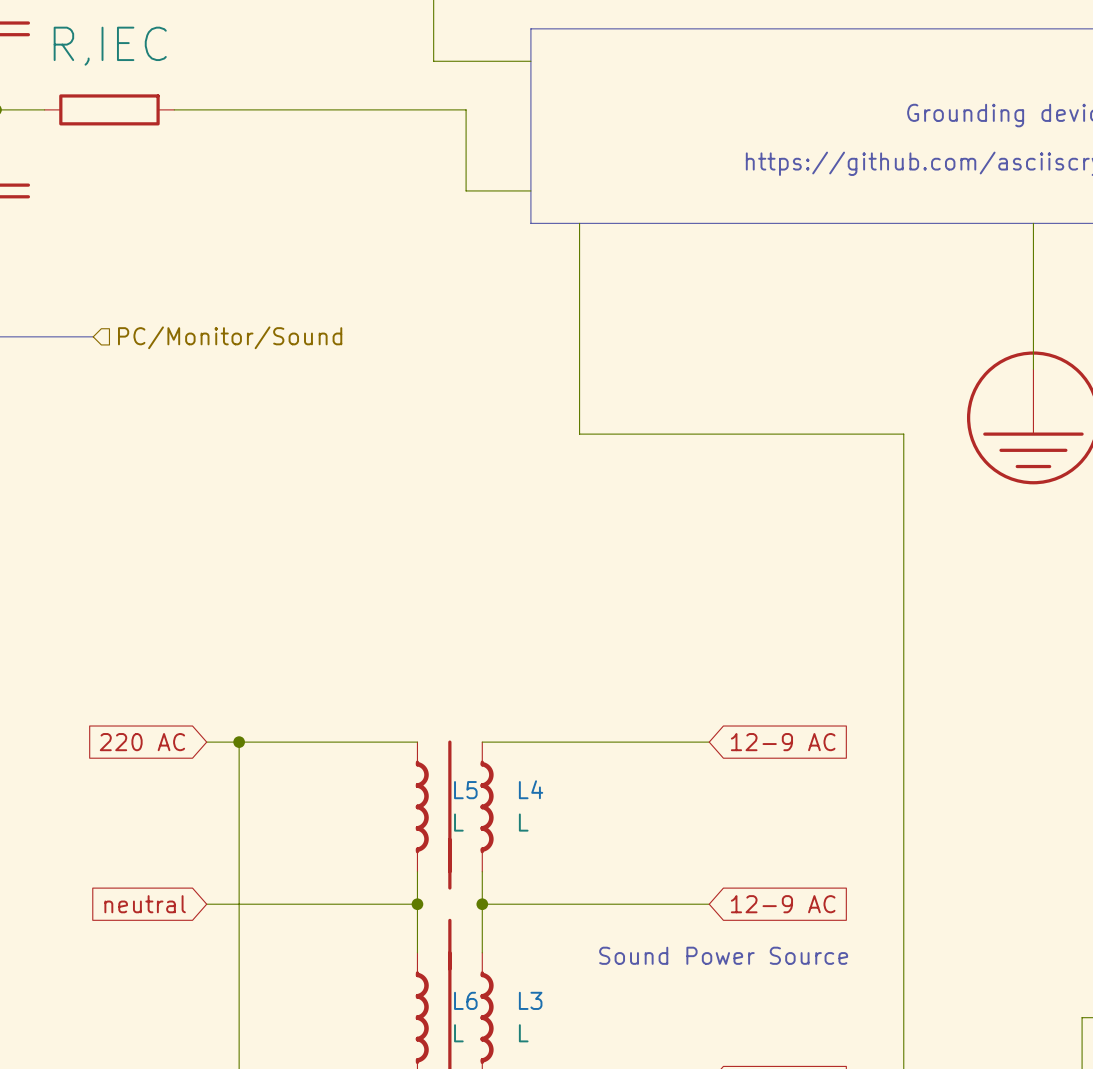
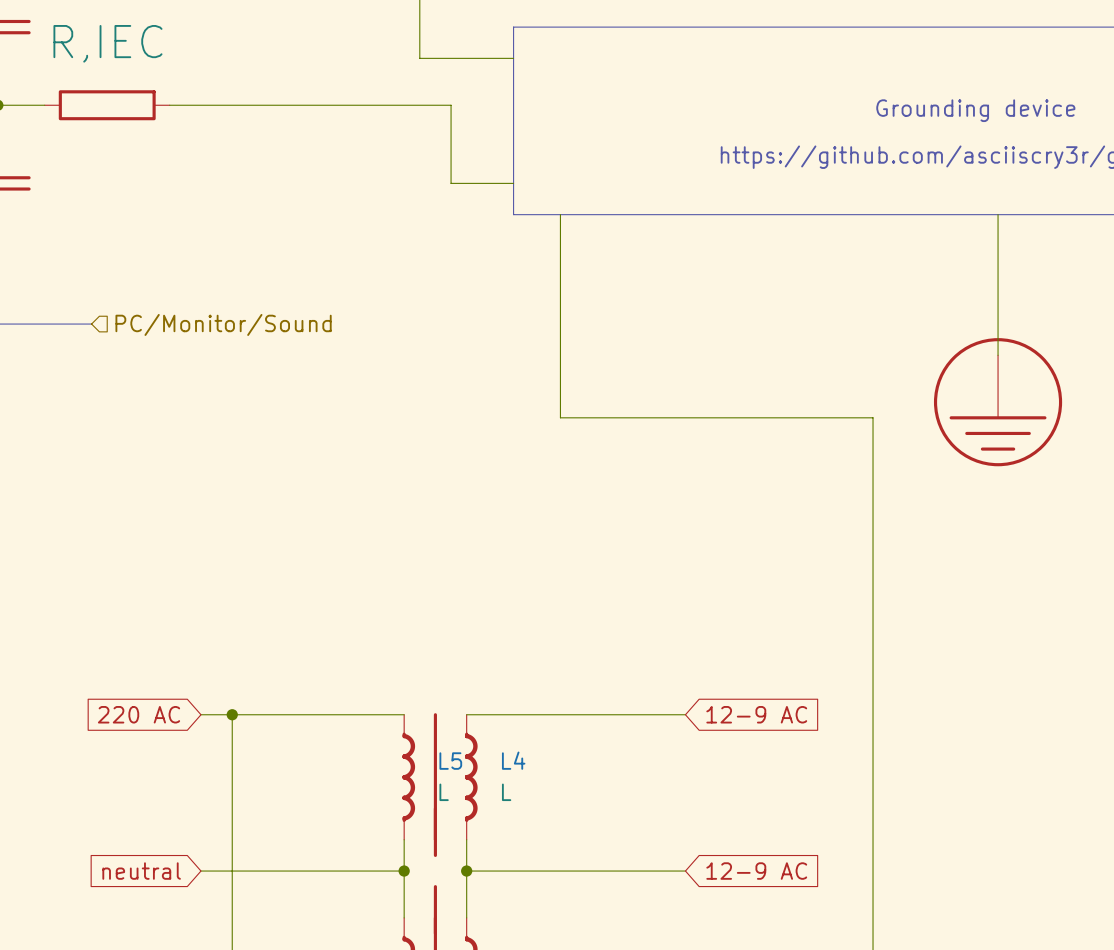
text: Sound Power Source (723, 955) -> none

